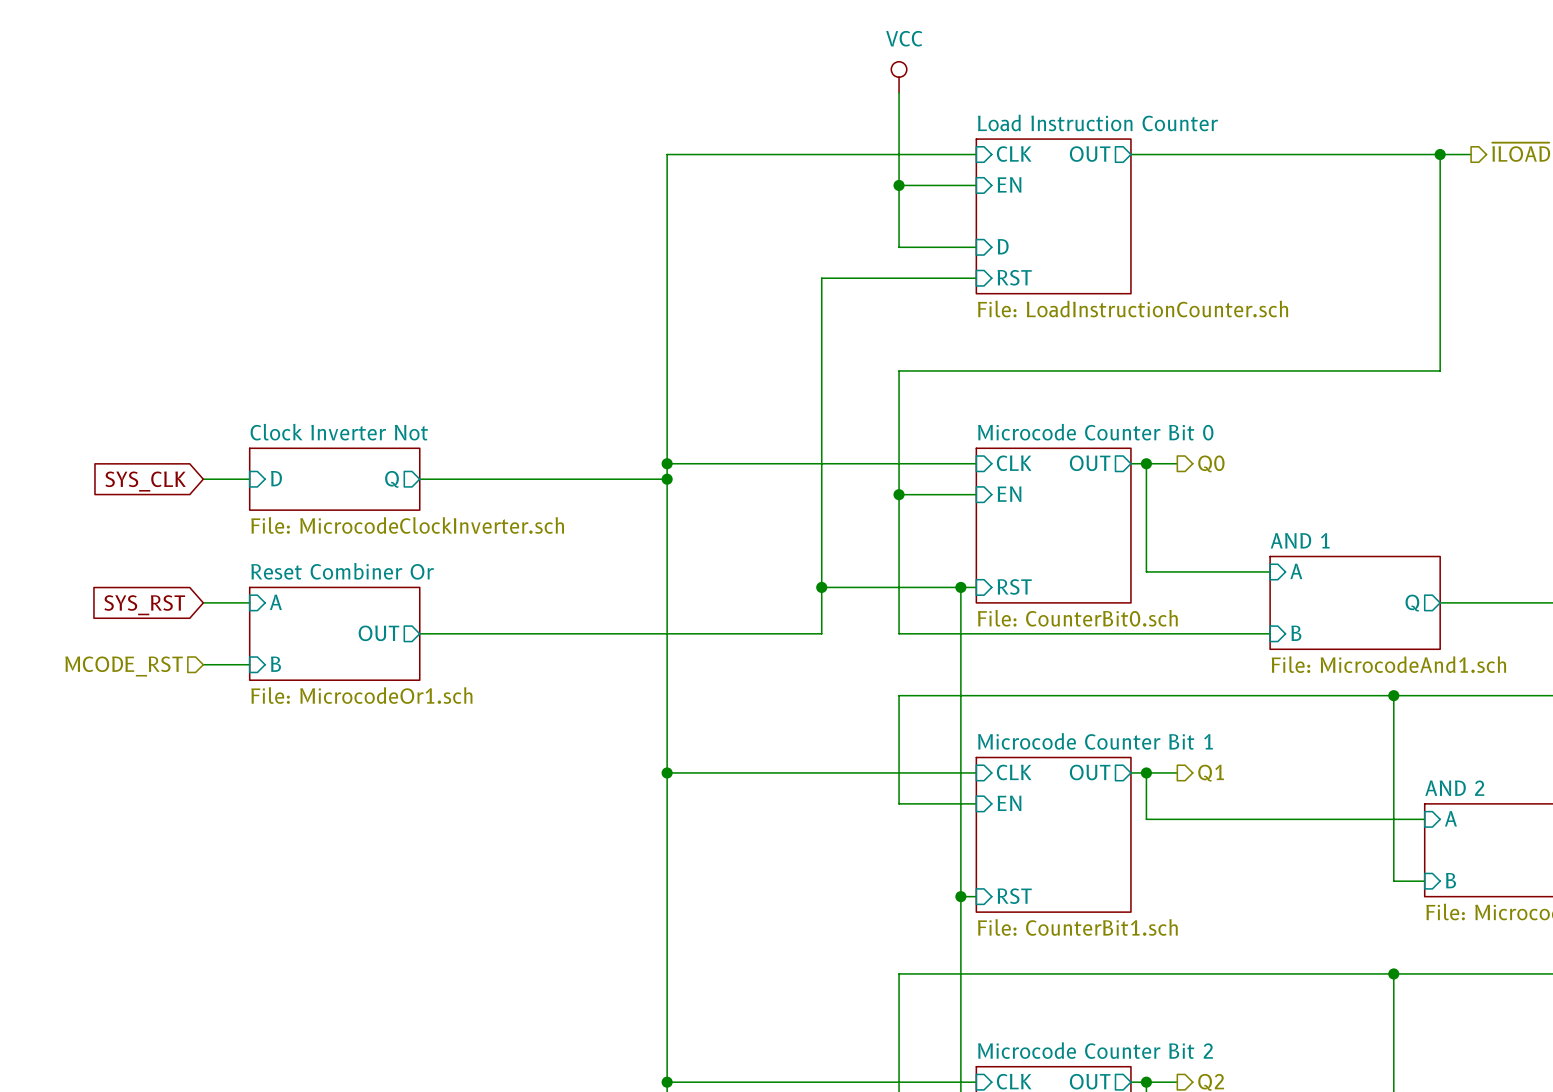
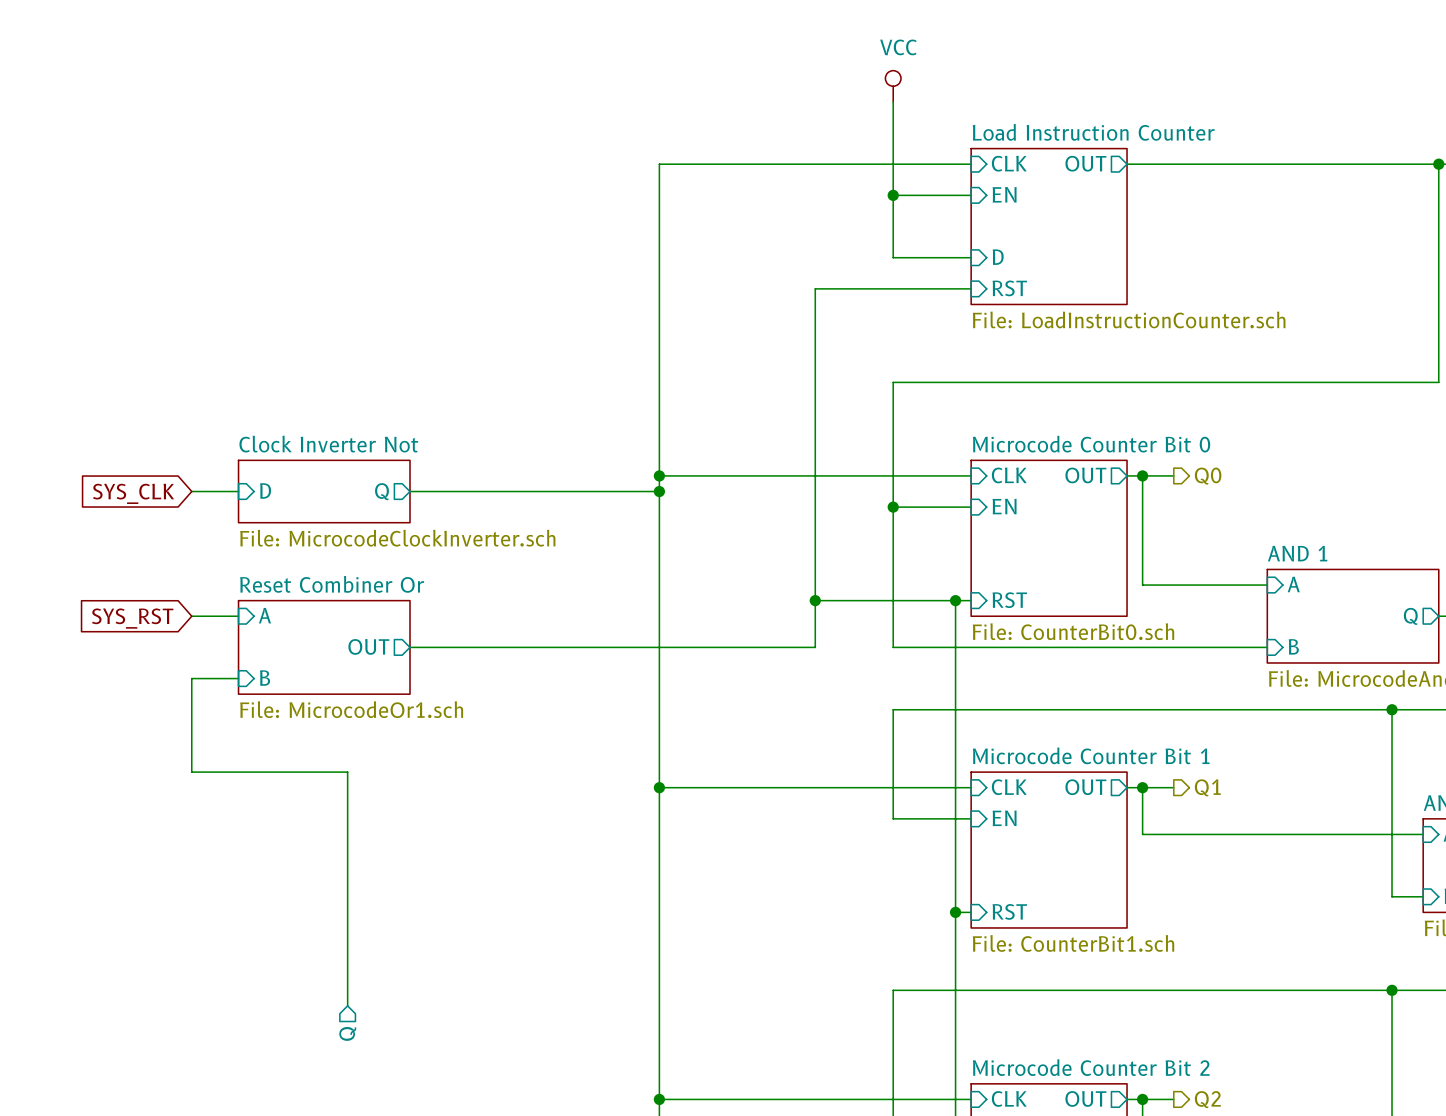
wire: none -> (191, 678) (191, 772) (347, 772) (347, 1005)
hierarchical label: MCODE_RST (124, 666) -> none
sheet pin: none -> Q (347, 1033)

